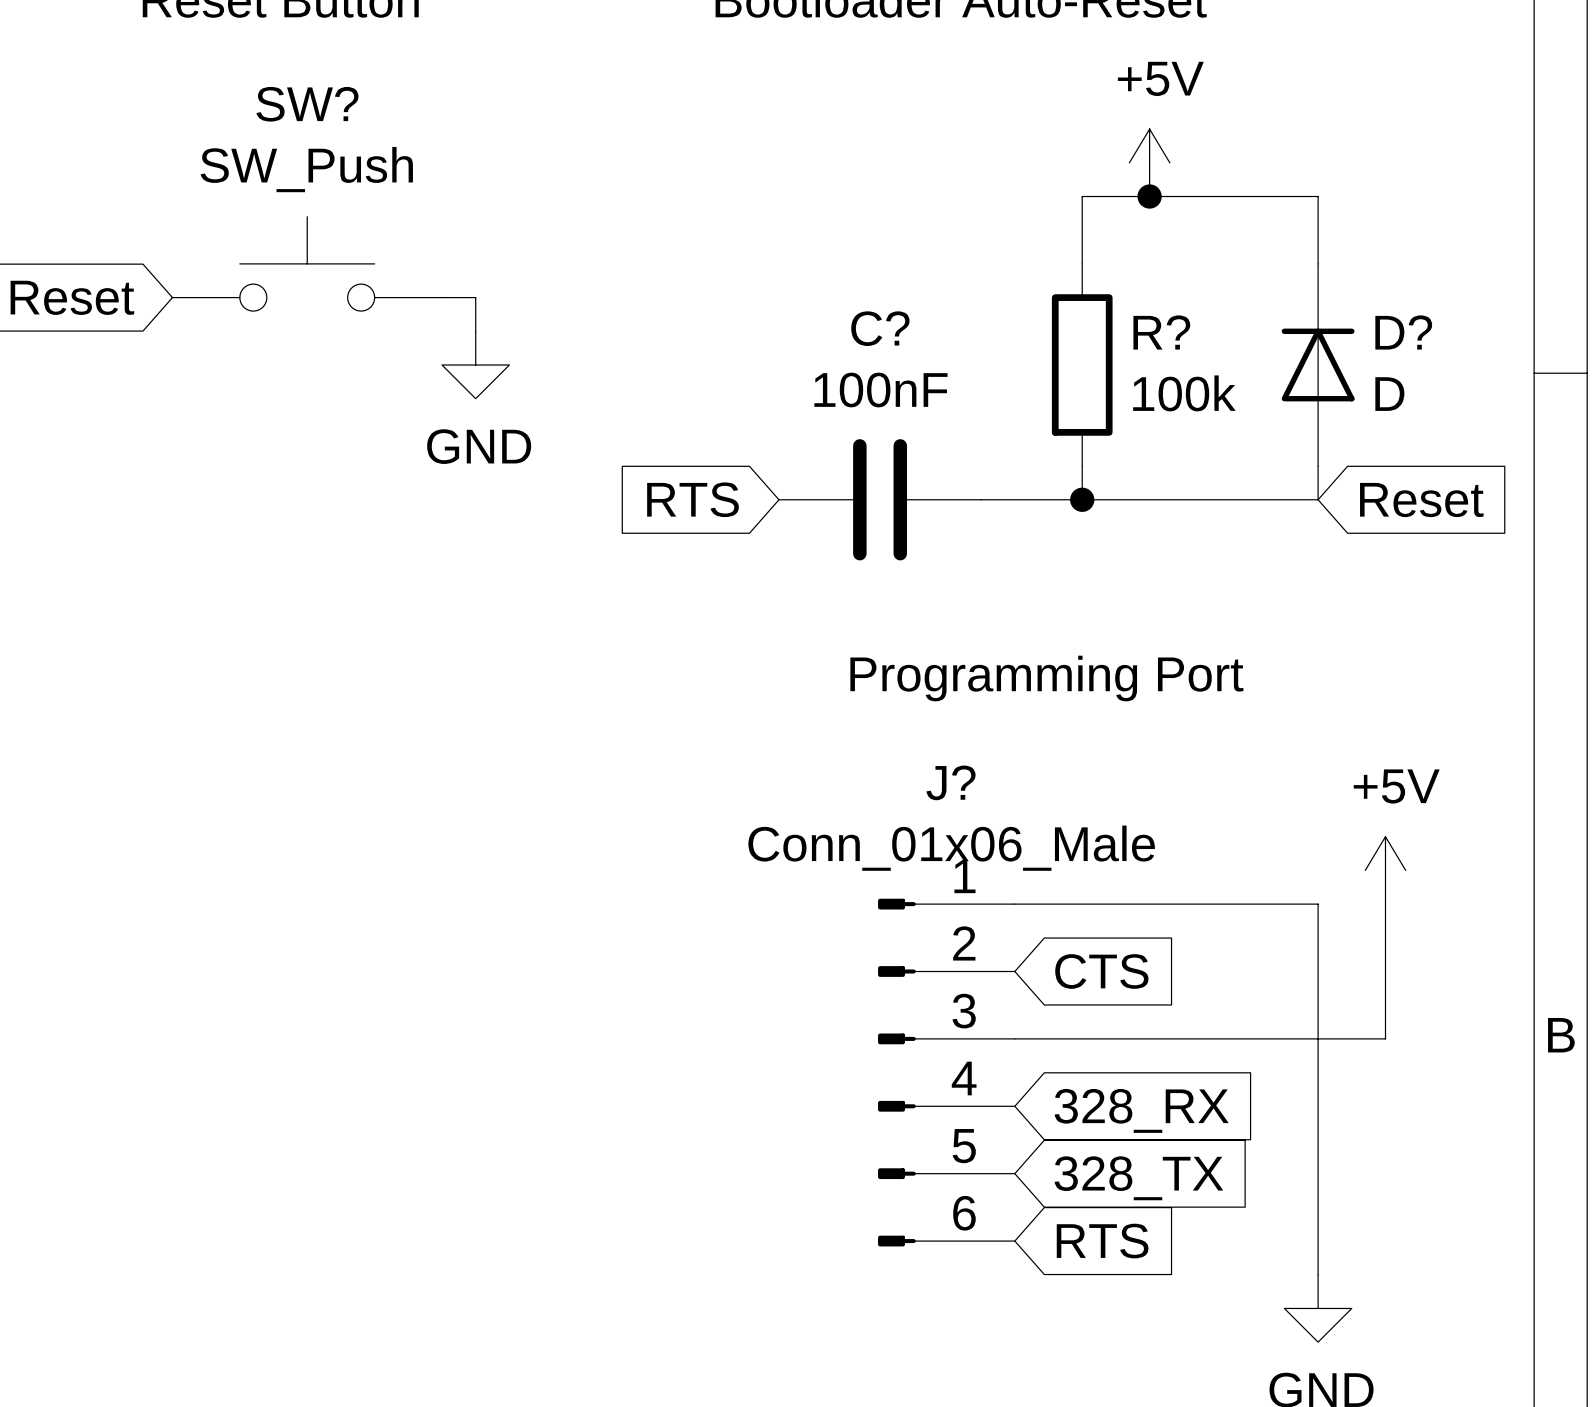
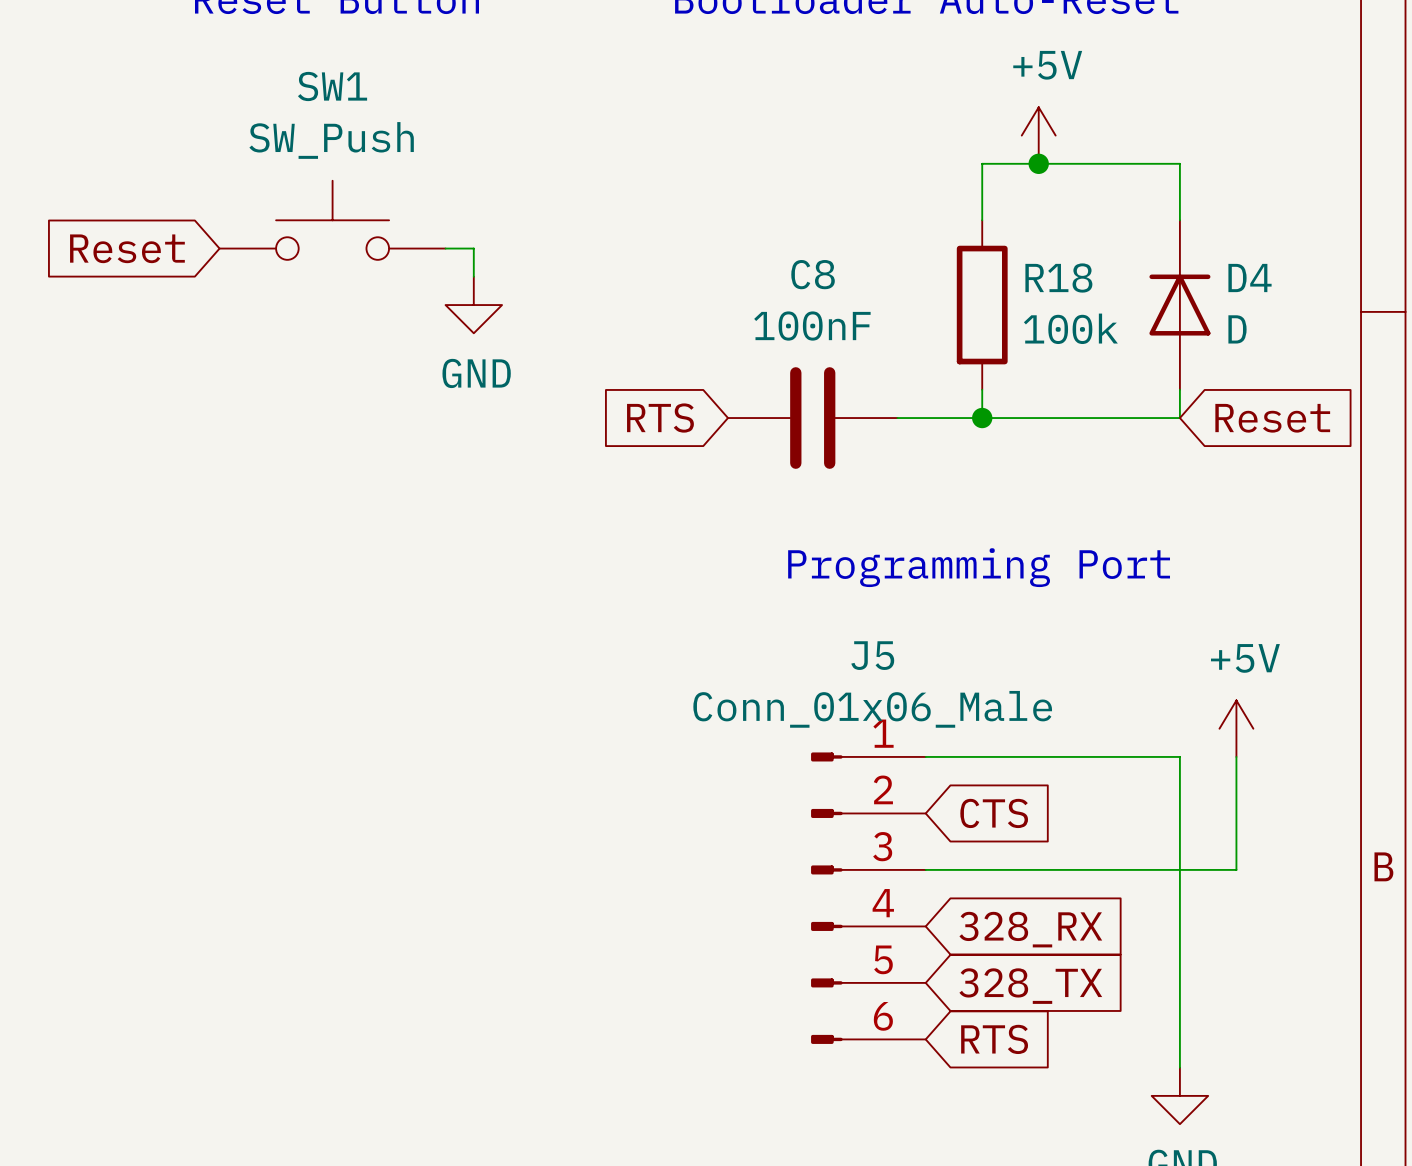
SW? name: SW? (307, 104) -> SW1 (332, 86)
C? name: C? (880, 328) -> C8 (813, 274)
R? name: R? (1161, 332) -> R18 (1058, 278)
D? name: D? (1403, 332) -> D4 (1250, 278)
J? name: J? (950, 782) -> J5 (872, 655)

